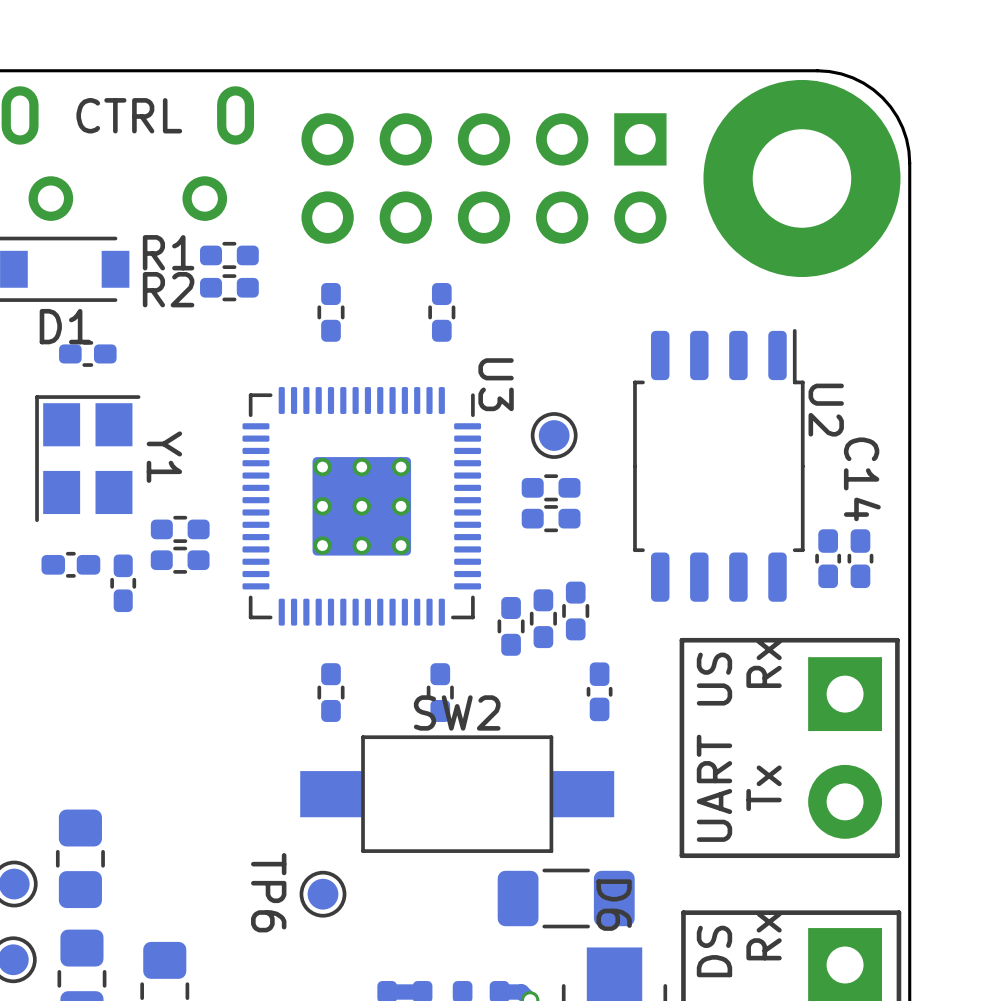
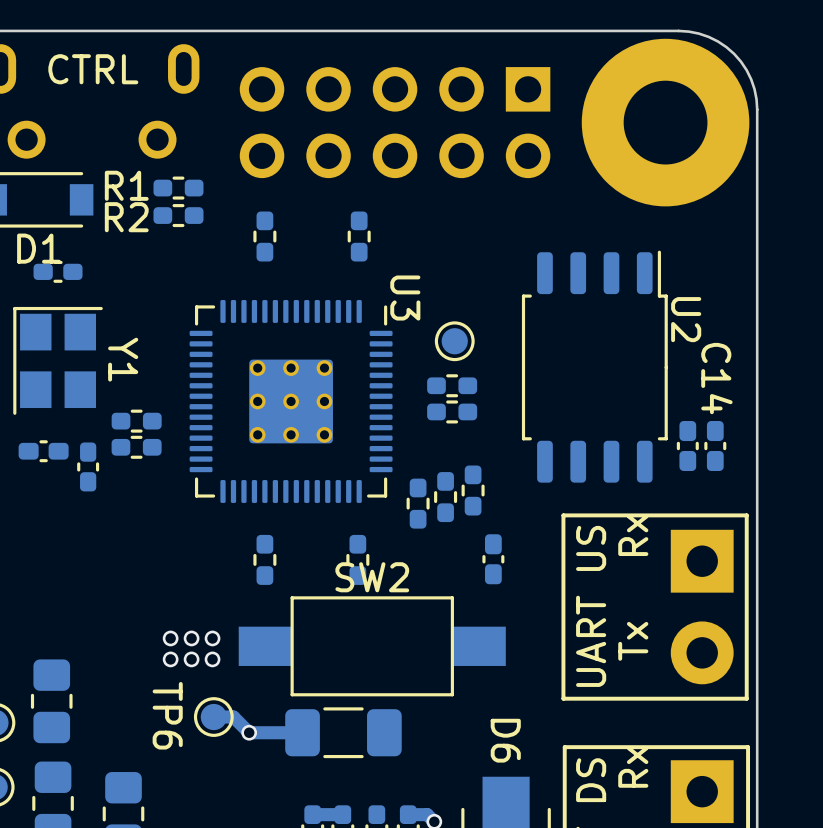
via: none -> (170, 638)
via: none -> (191, 638)
via: none -> (212, 638)
via: none -> (170, 659)
via: none -> (191, 659)
via: none -> (212, 659)
track: none -> (213, 717) (233, 717) (249, 732) (302, 732)
TP6 position: (322, 894) -> (213, 717)
via: none -> (249, 732)
part position: (566, 898) -> (343, 732)

